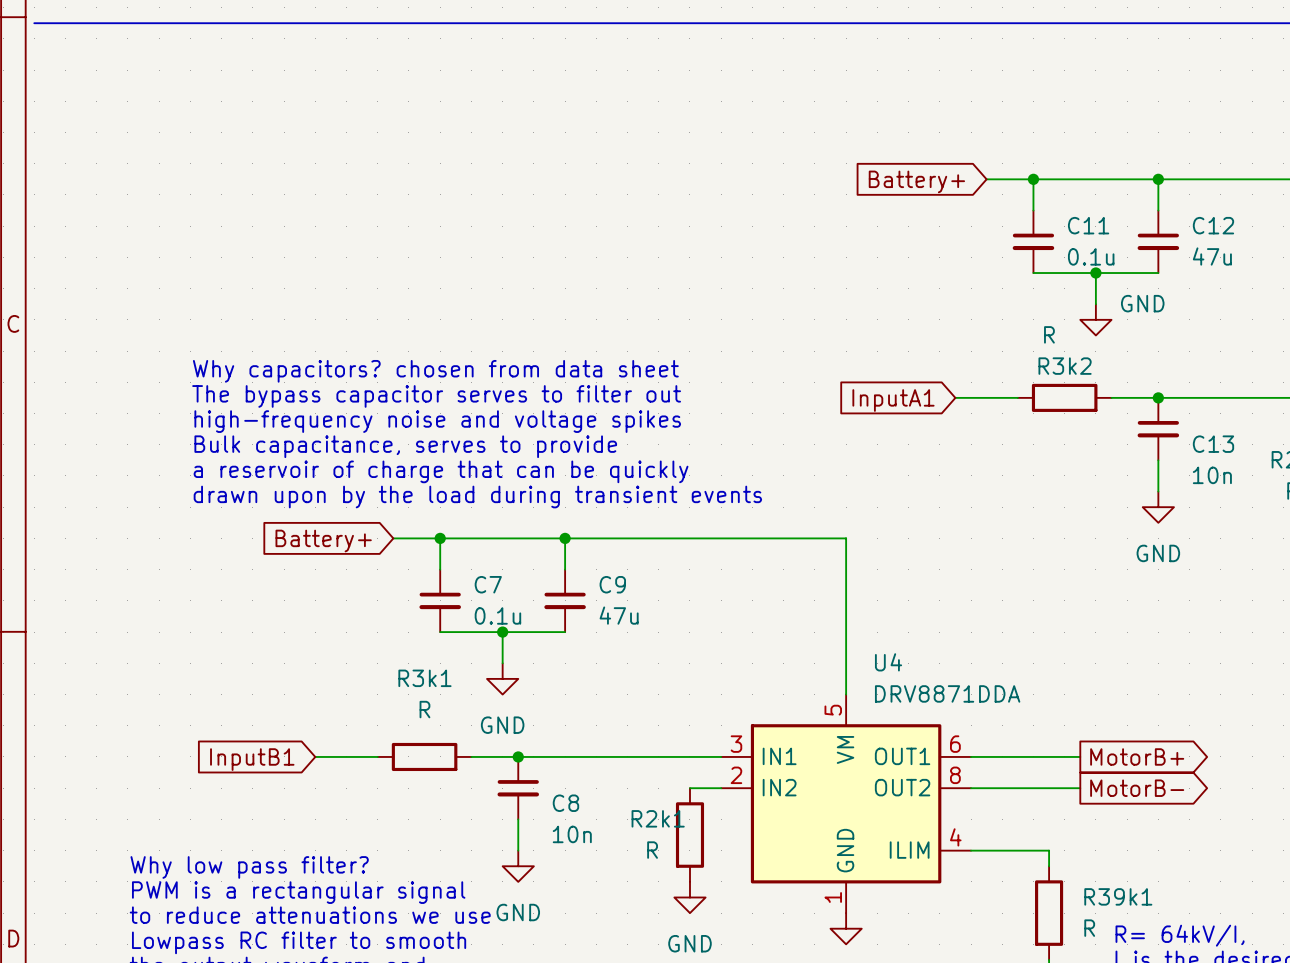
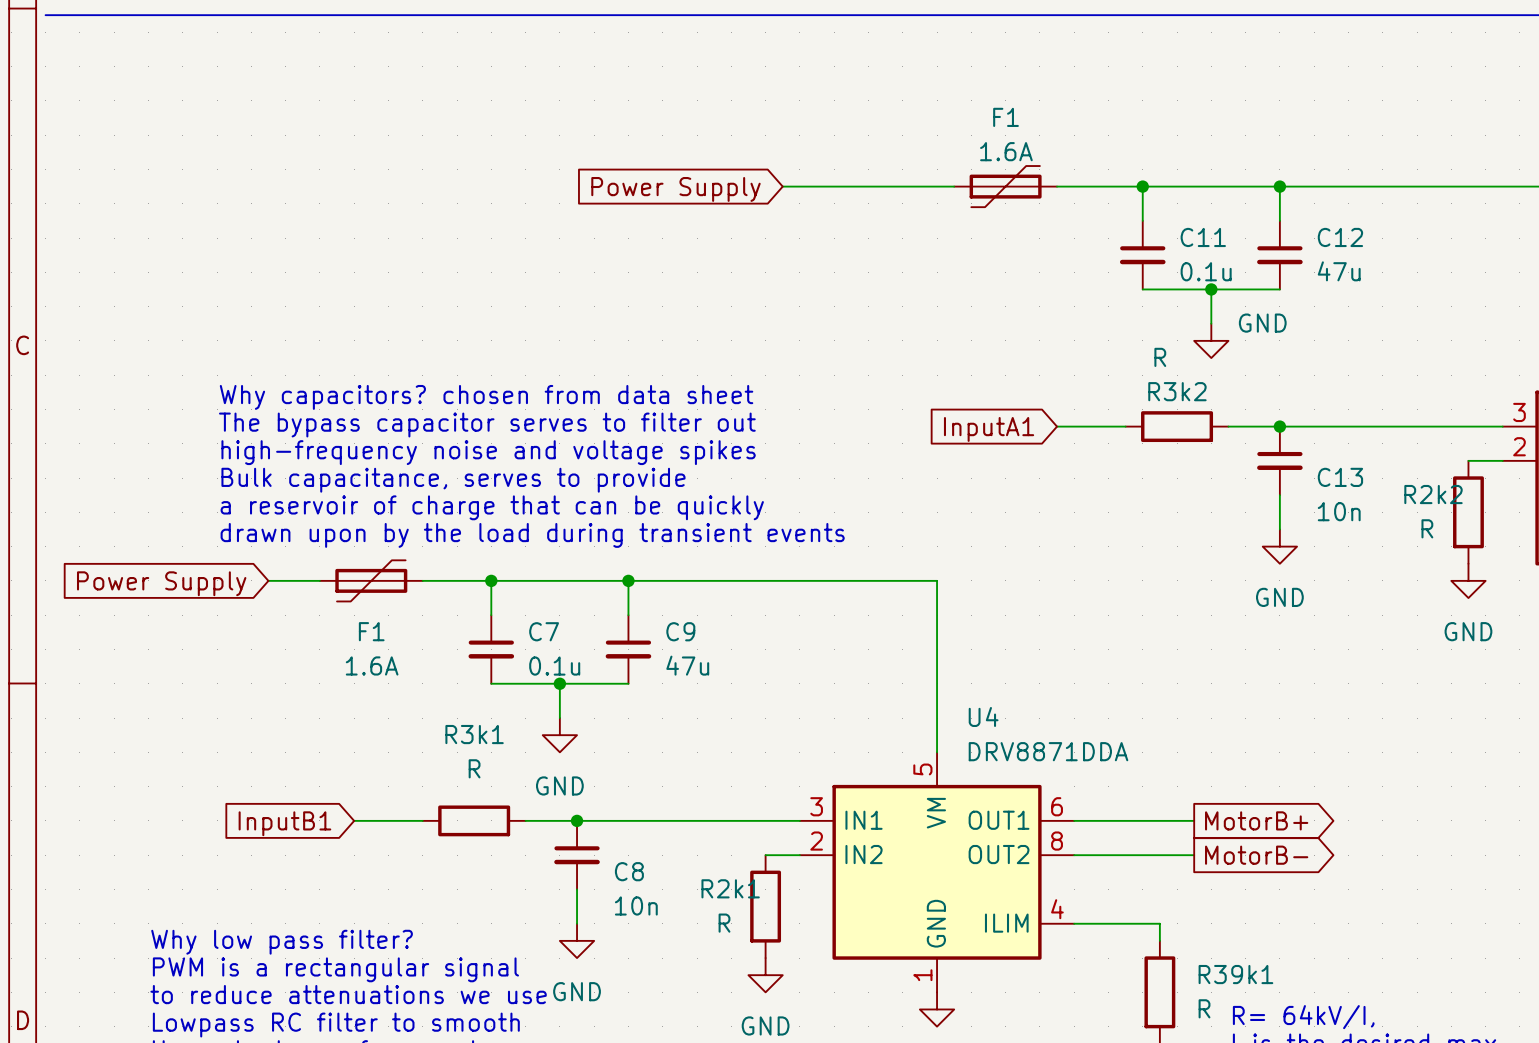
wire: none -> (782, 186) (954, 186)
F1: none -> 1.6A (1005, 186)
wire: none -> (1057, 186) (1091, 186)
global label: none -> Power Supply (675, 189)
global label: Battery+ (916, 181) -> none
wire: none -> (268, 580) (319, 580)
F1: none -> 1.6A (371, 580)
wire: none -> (422, 580) (439, 580)
global label: none -> Power Supply (161, 583)
global label: Battery+ (323, 541) -> none

